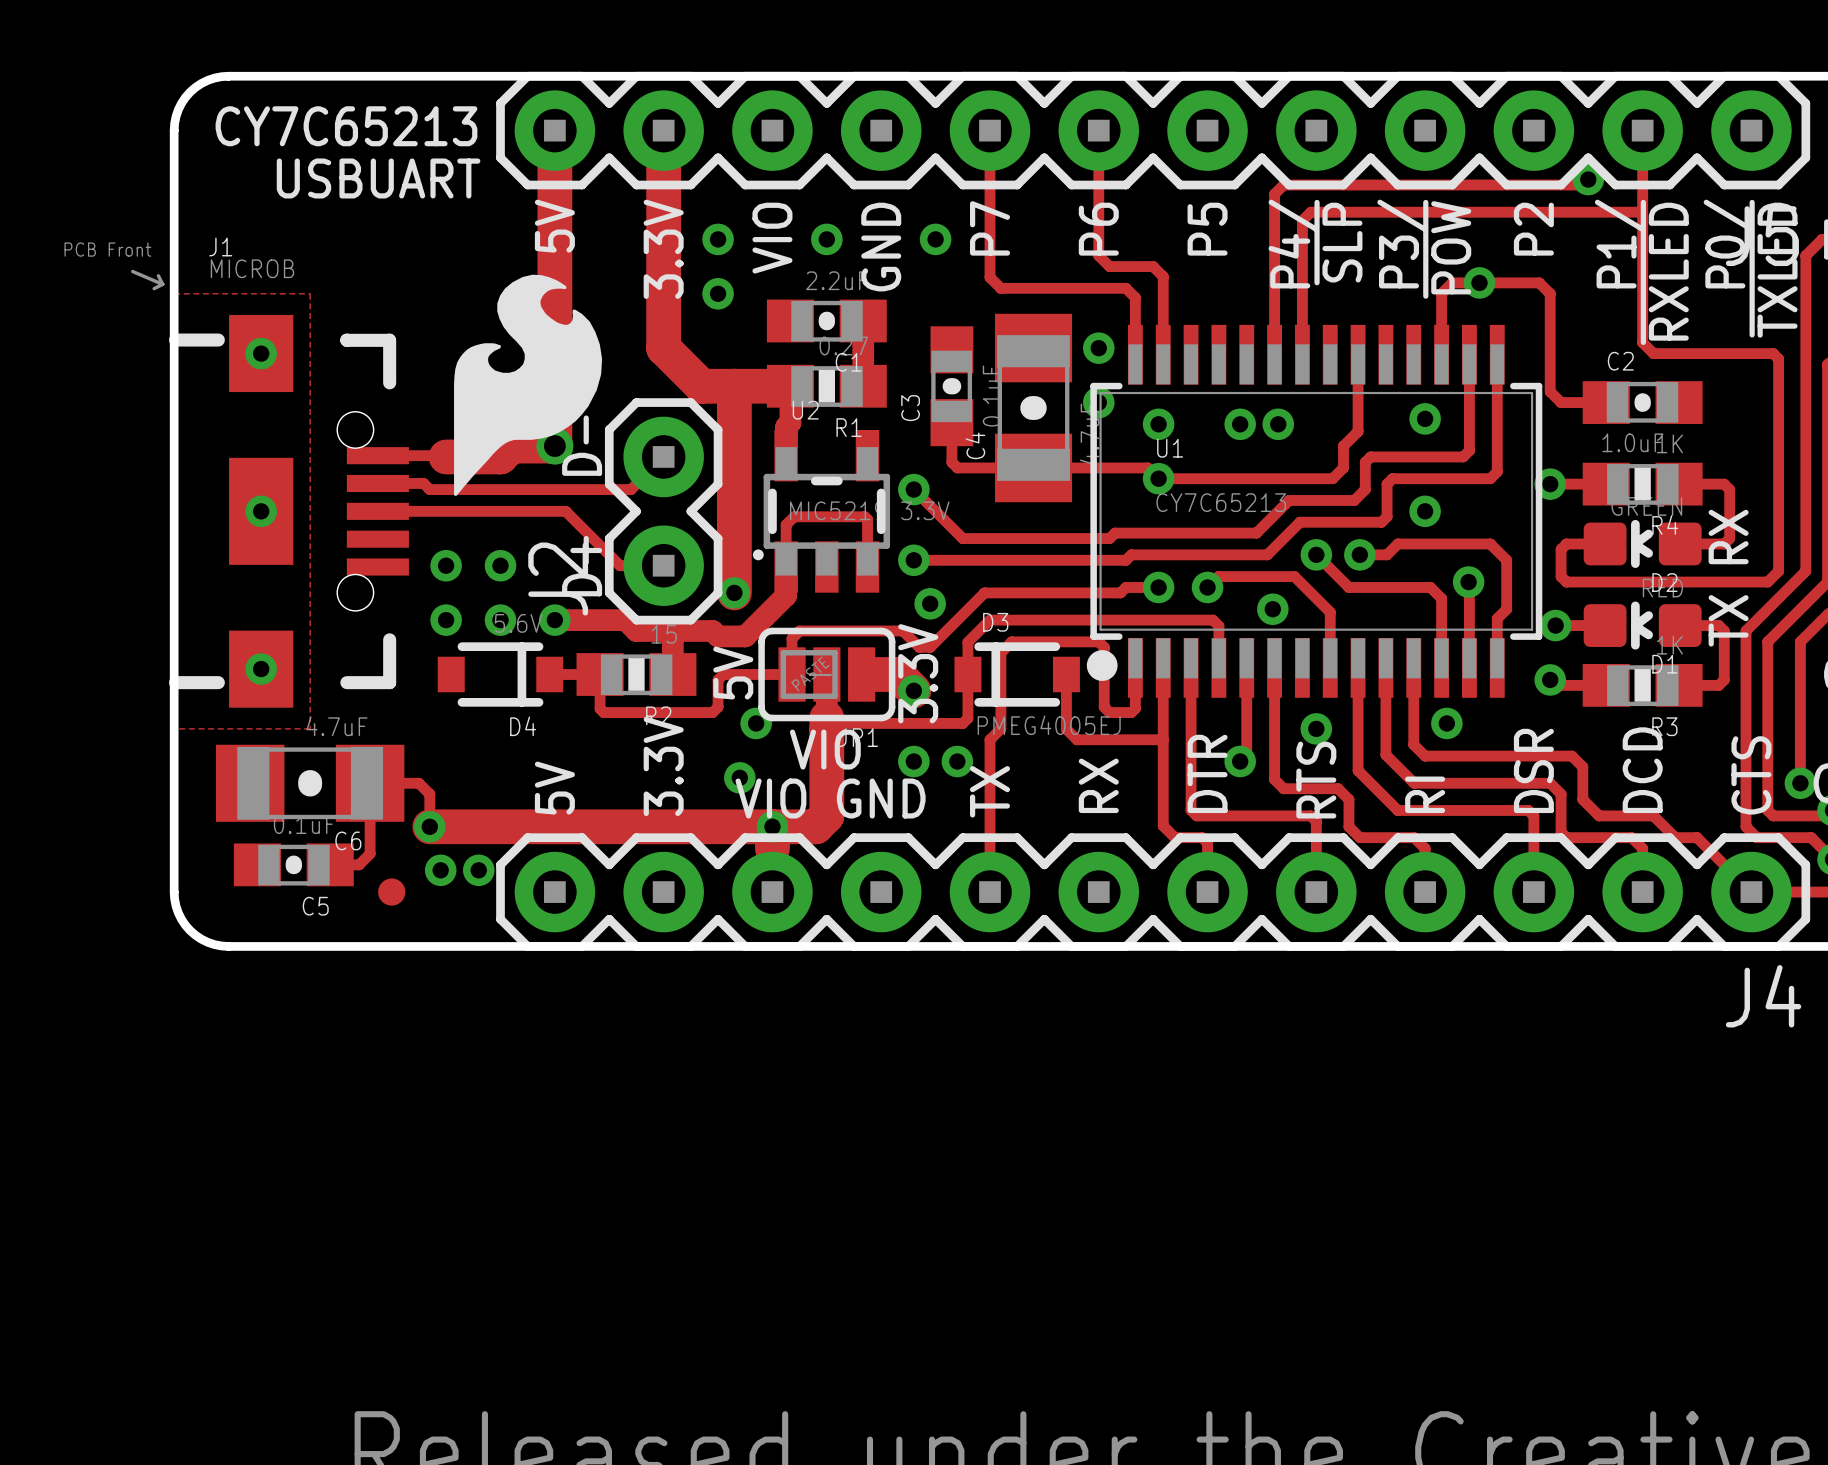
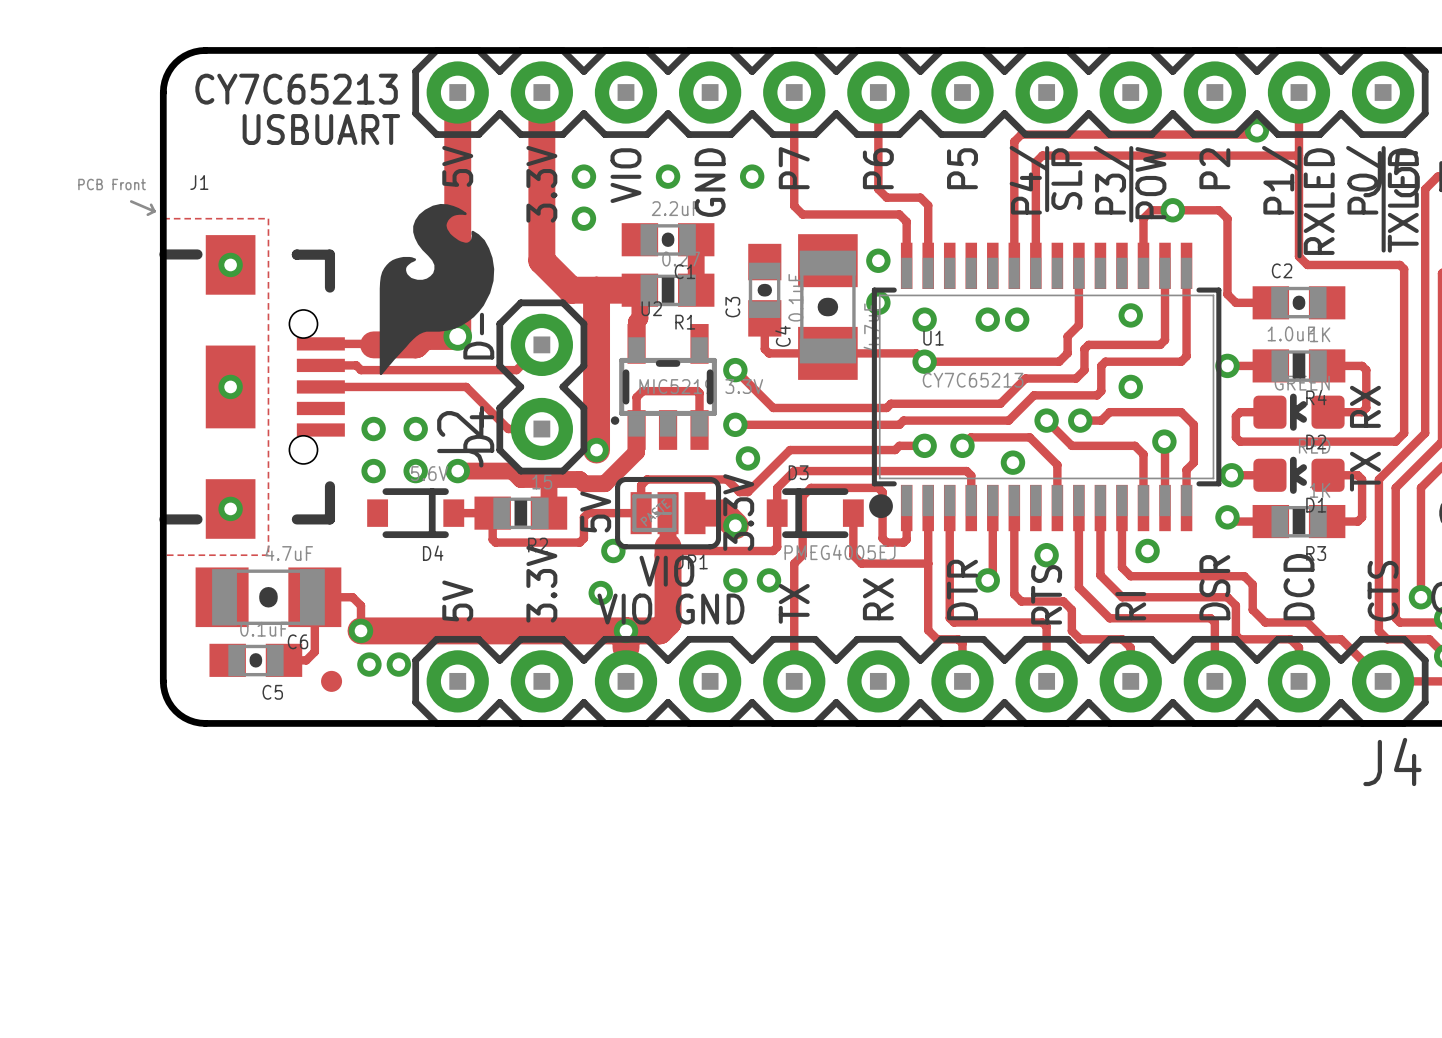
J1 value: MICROB (252, 268) -> none

